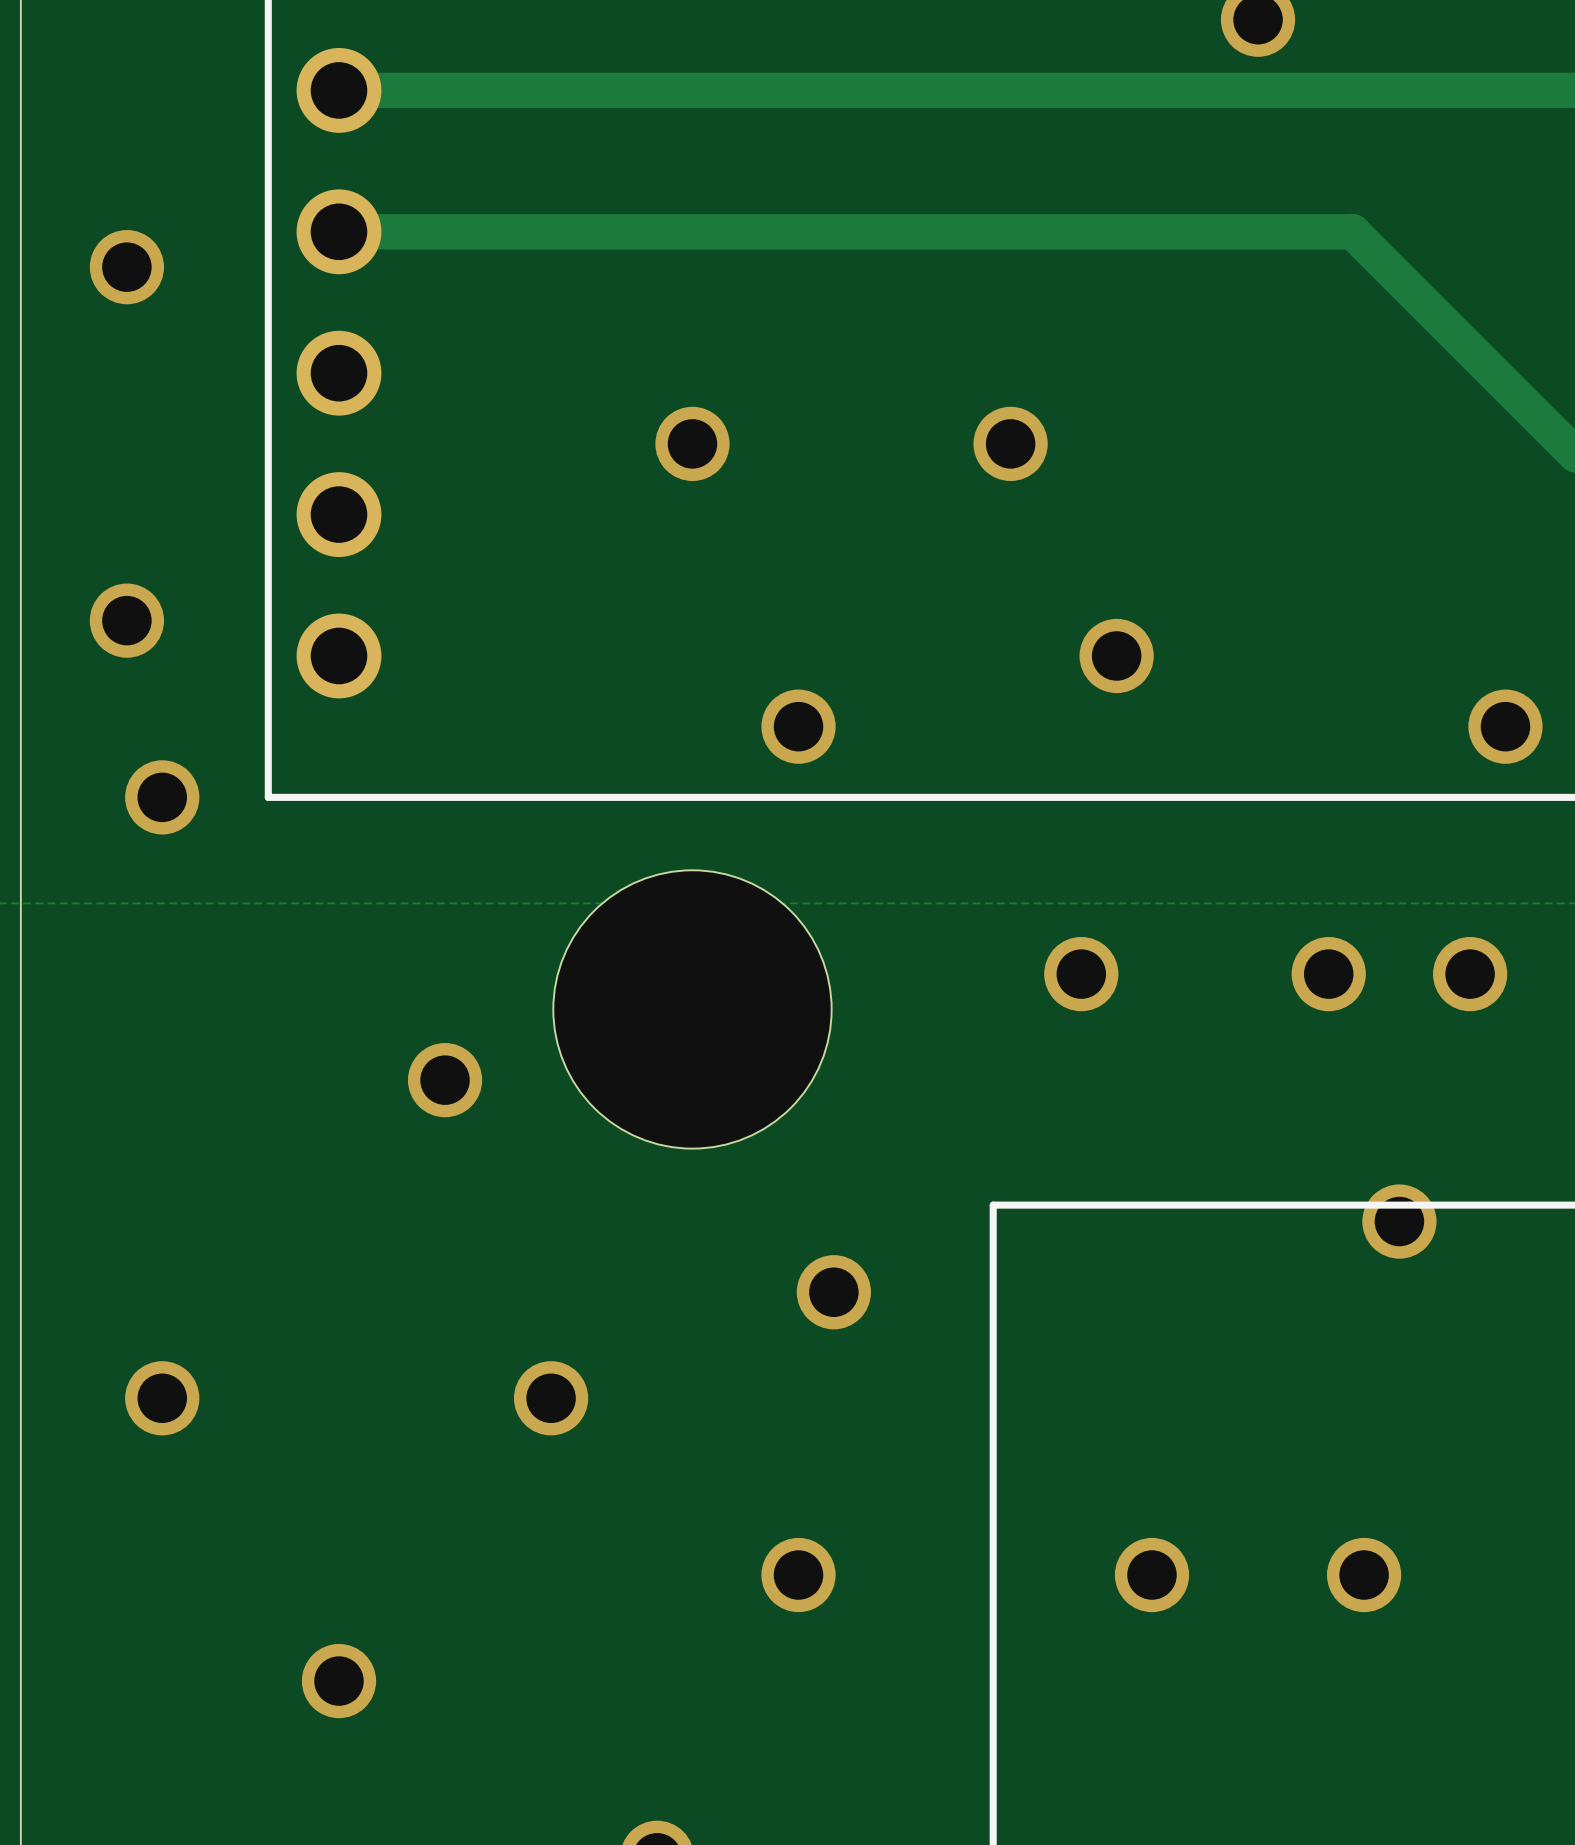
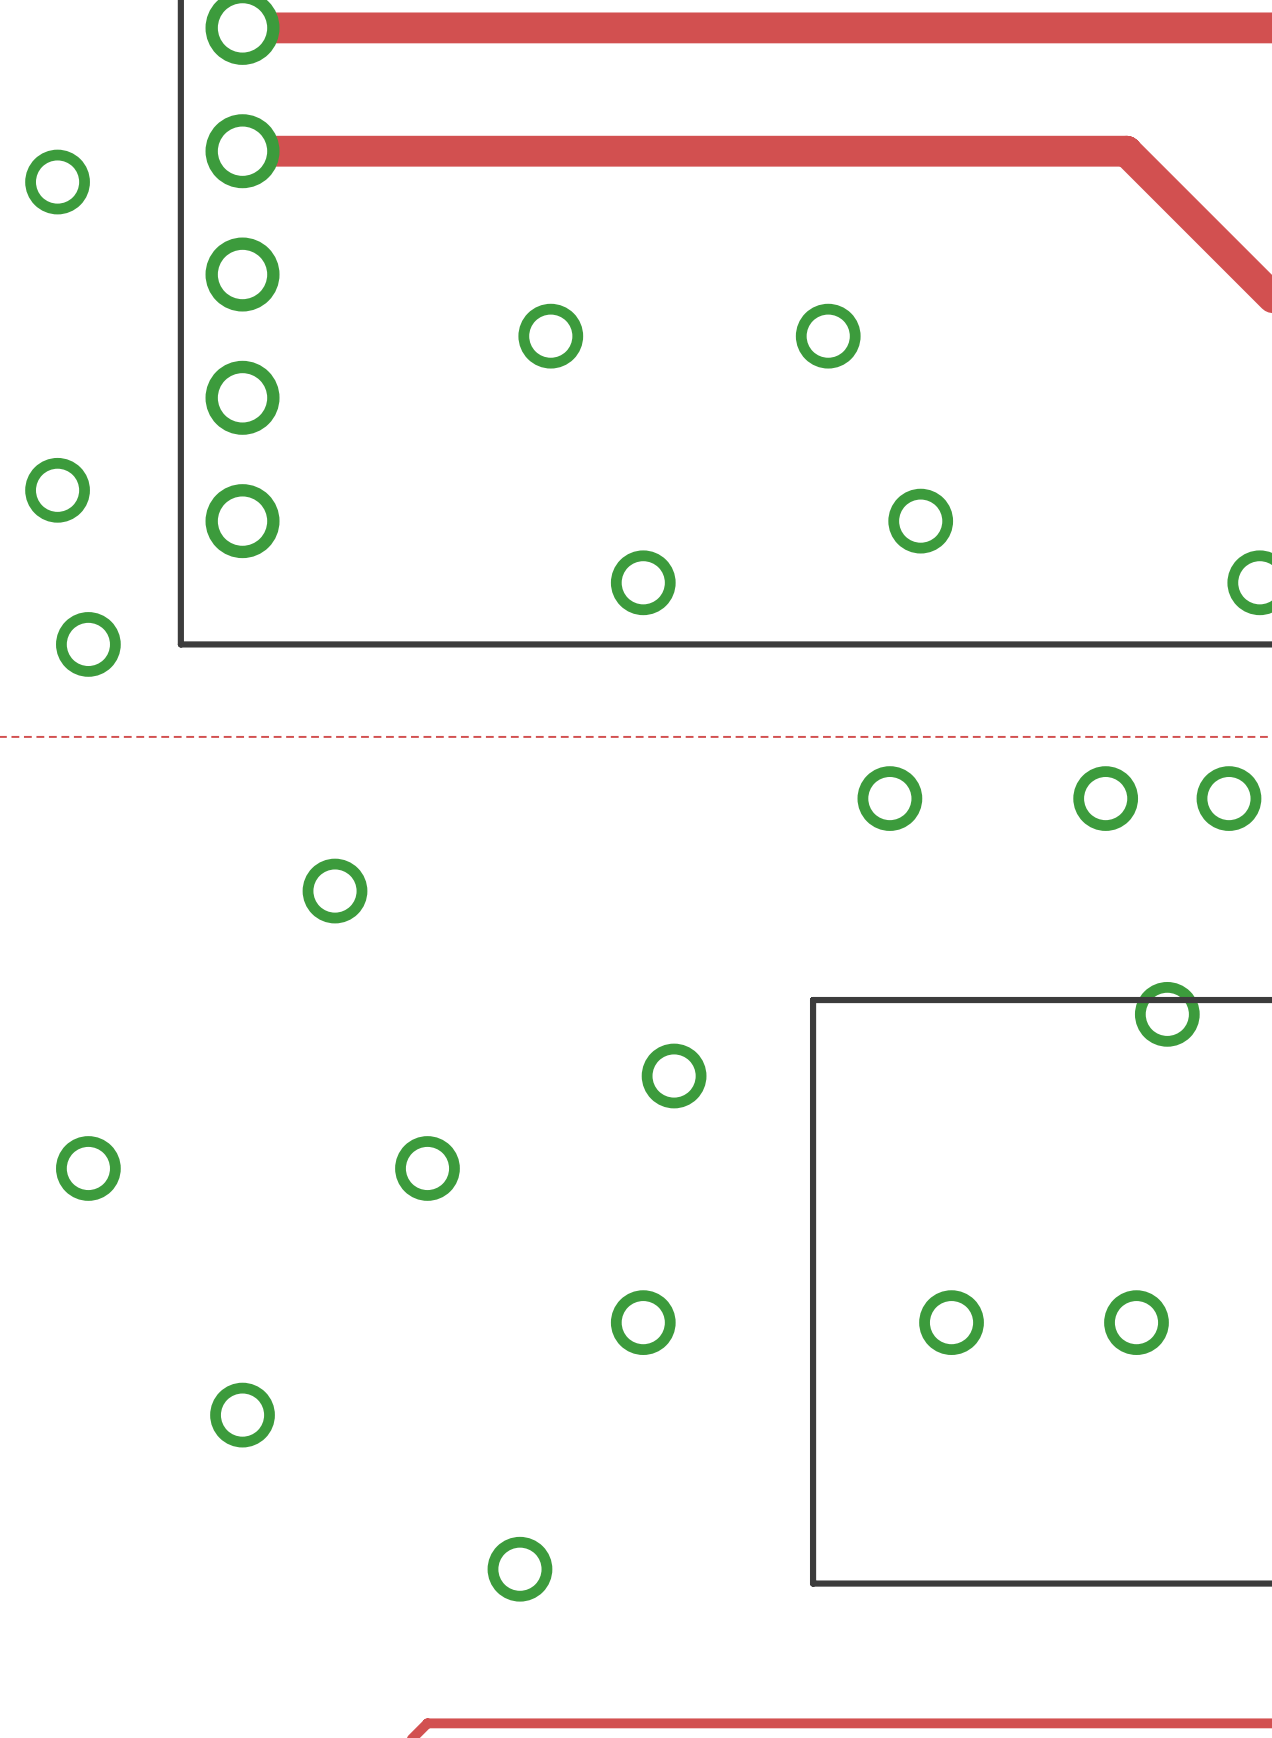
hole: (692, 1009) -> none

